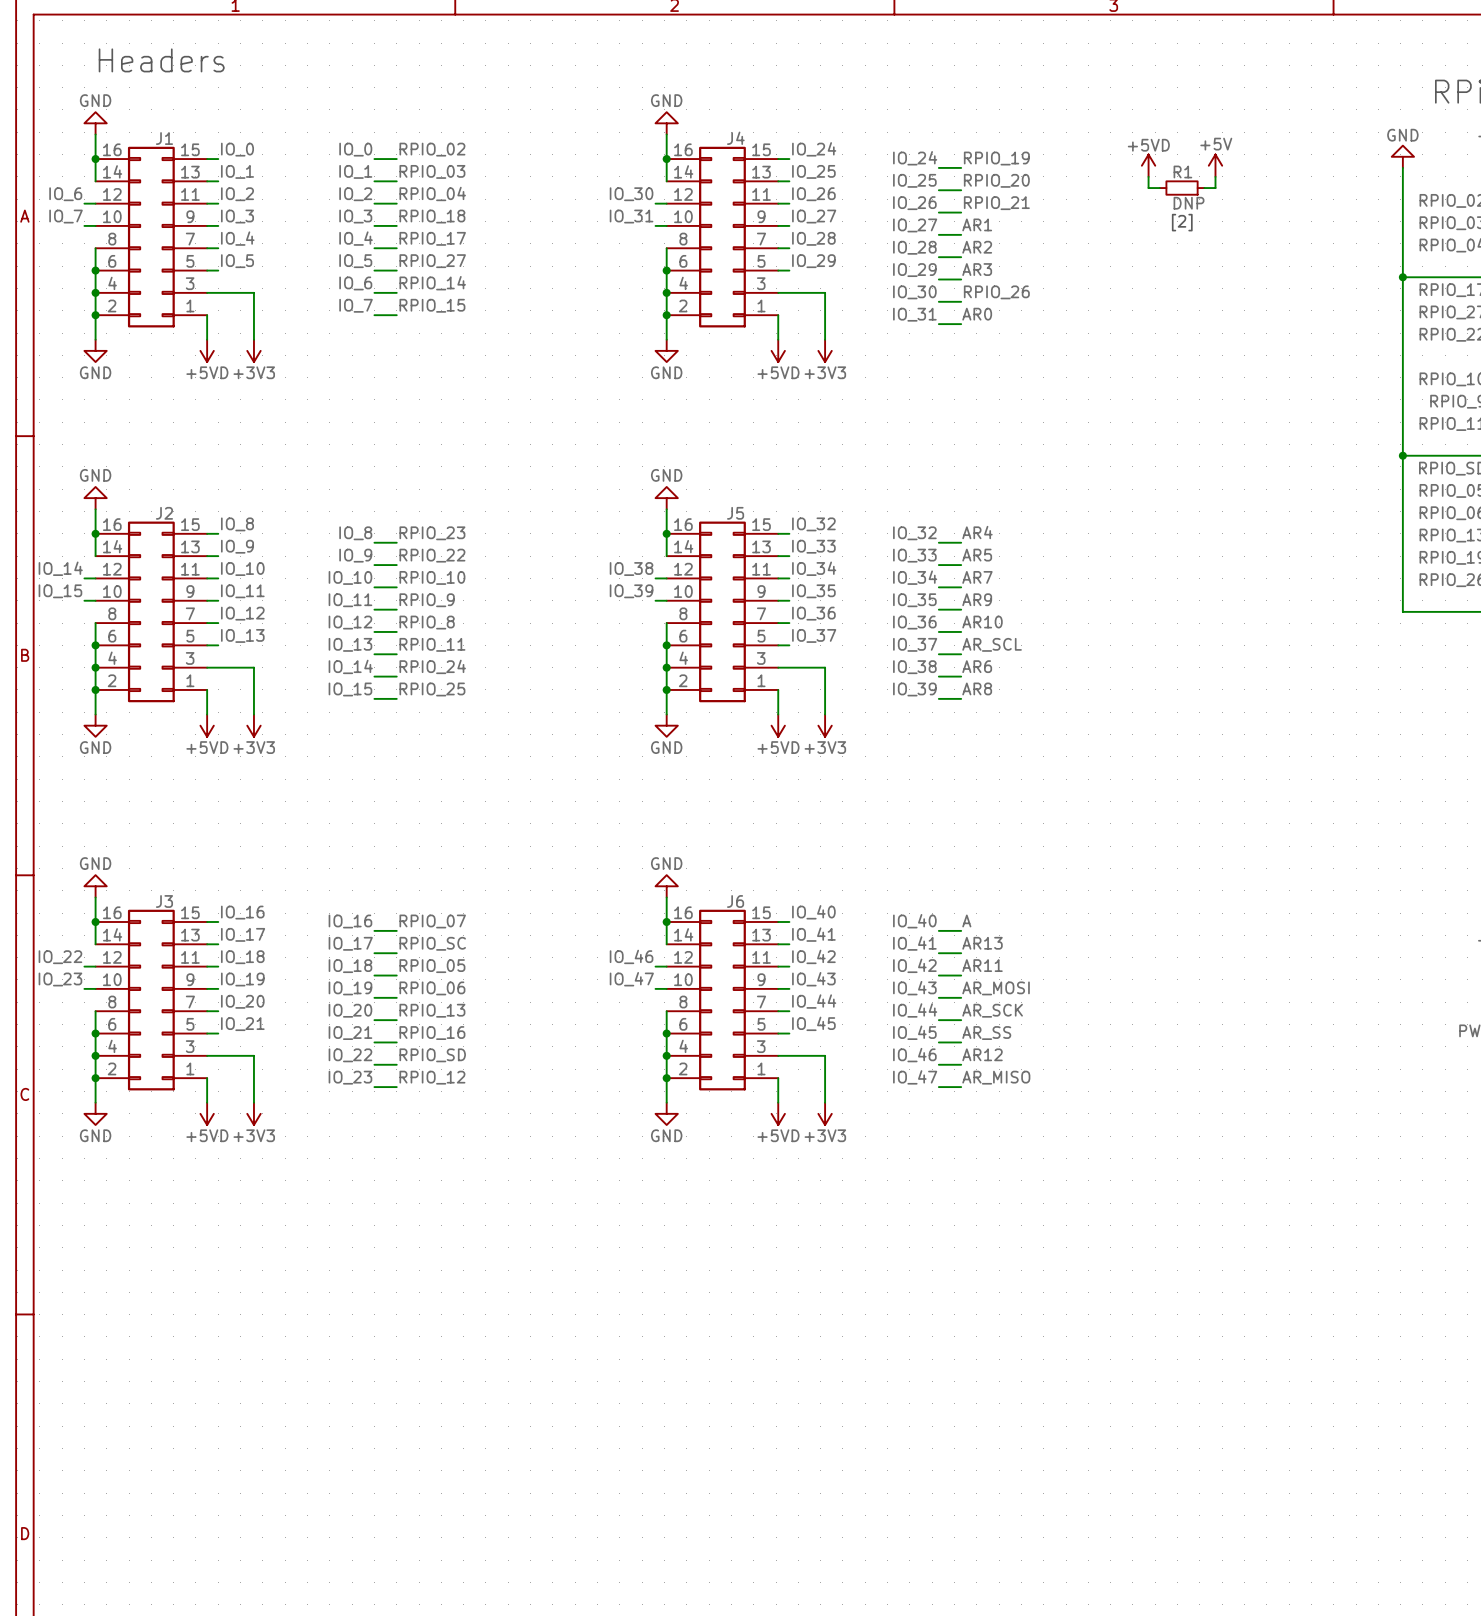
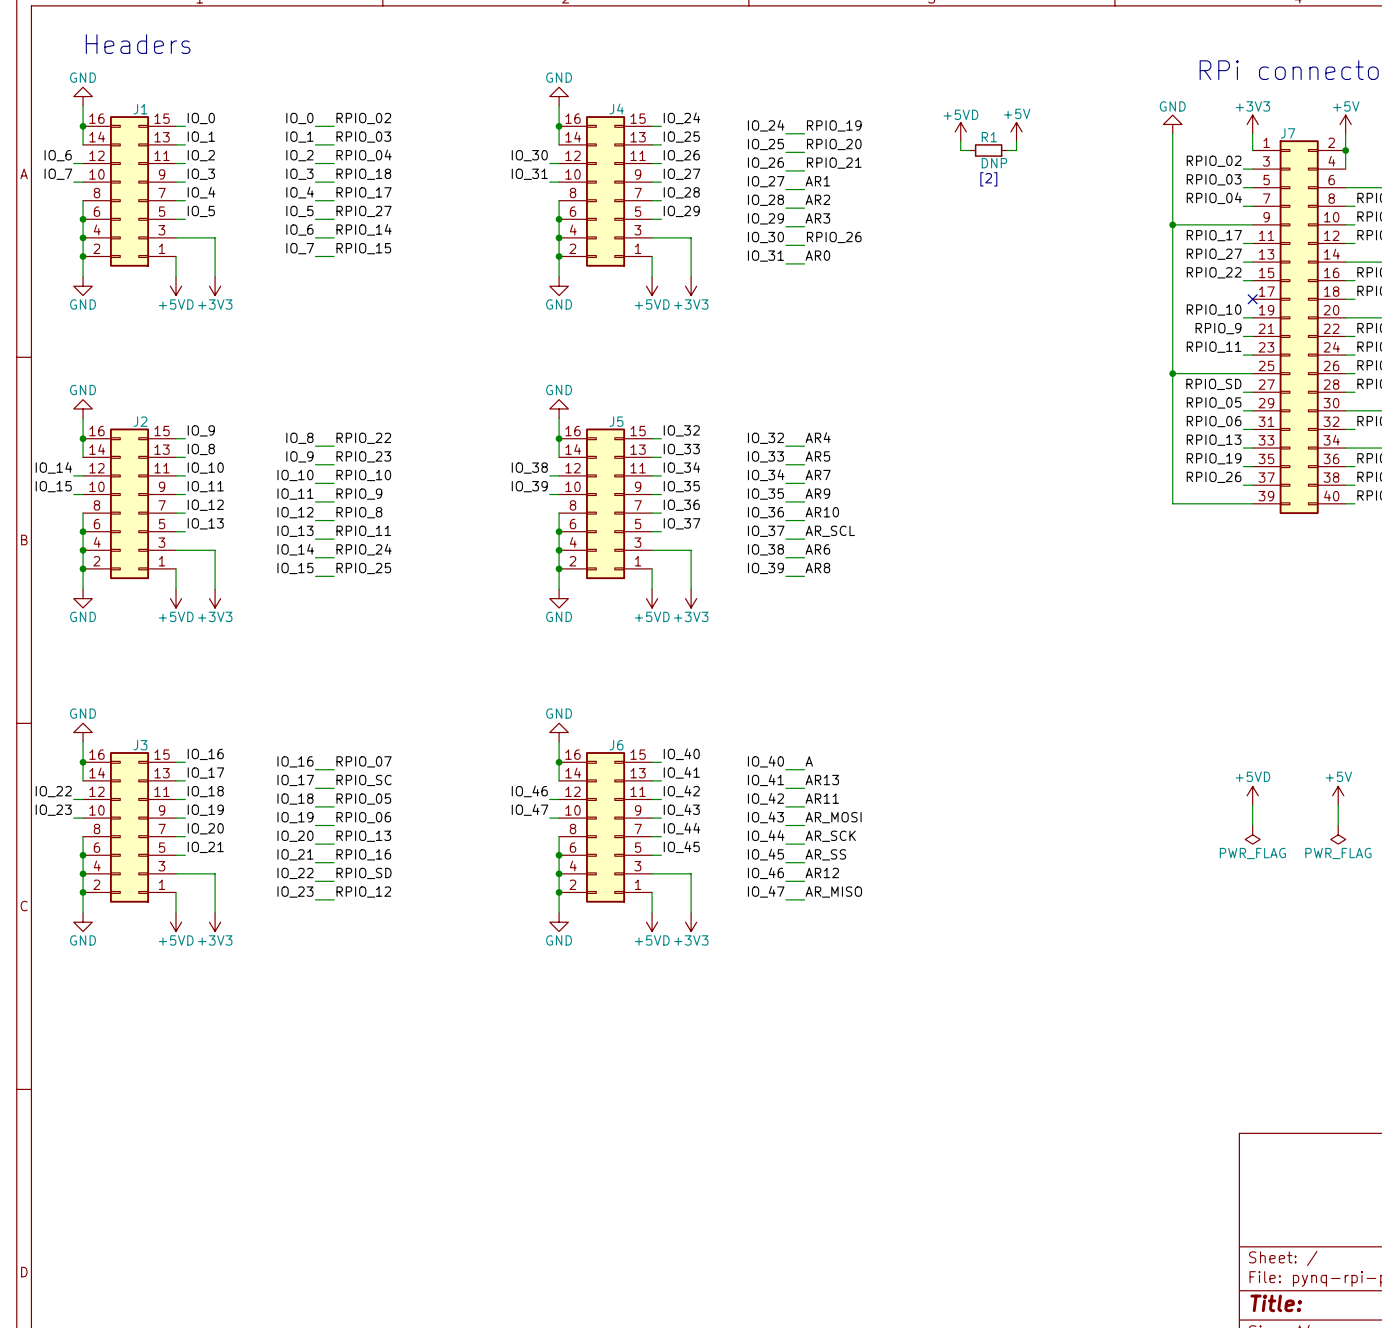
label: IO_8 (237, 524) -> IO_9 (201, 430)
label: RPIO_23 (432, 533) -> RPIO_22 (363, 438)
label: IO_9 (237, 546) -> IO_8 (201, 449)
label: RPIO_22 (432, 555) -> RPIO_23 (363, 456)

